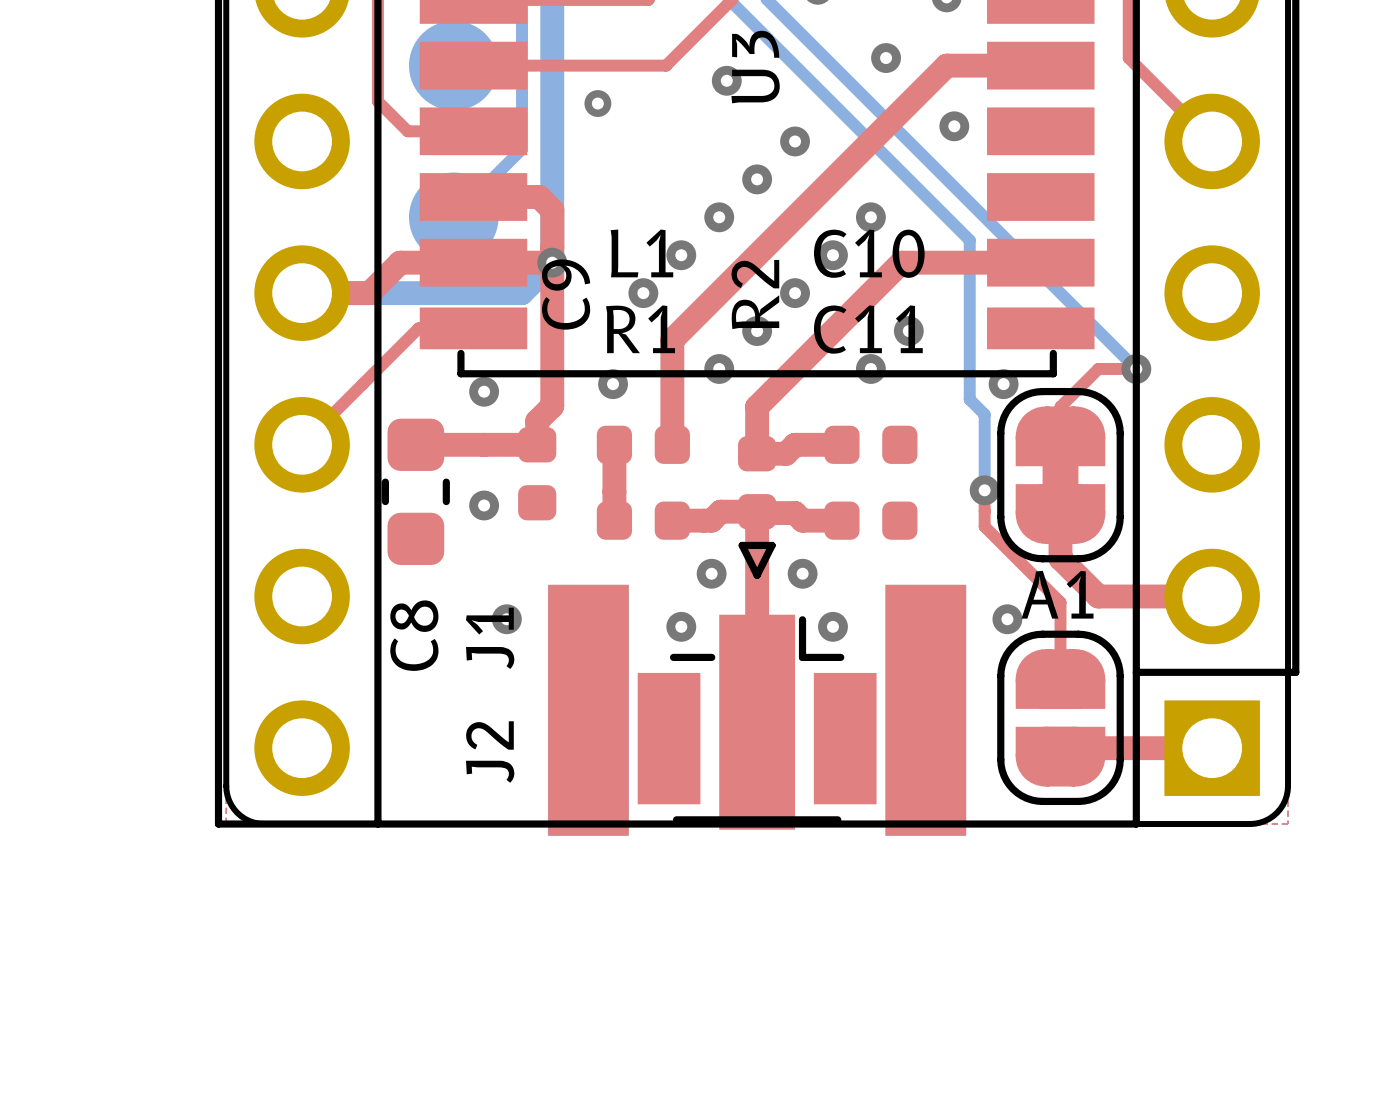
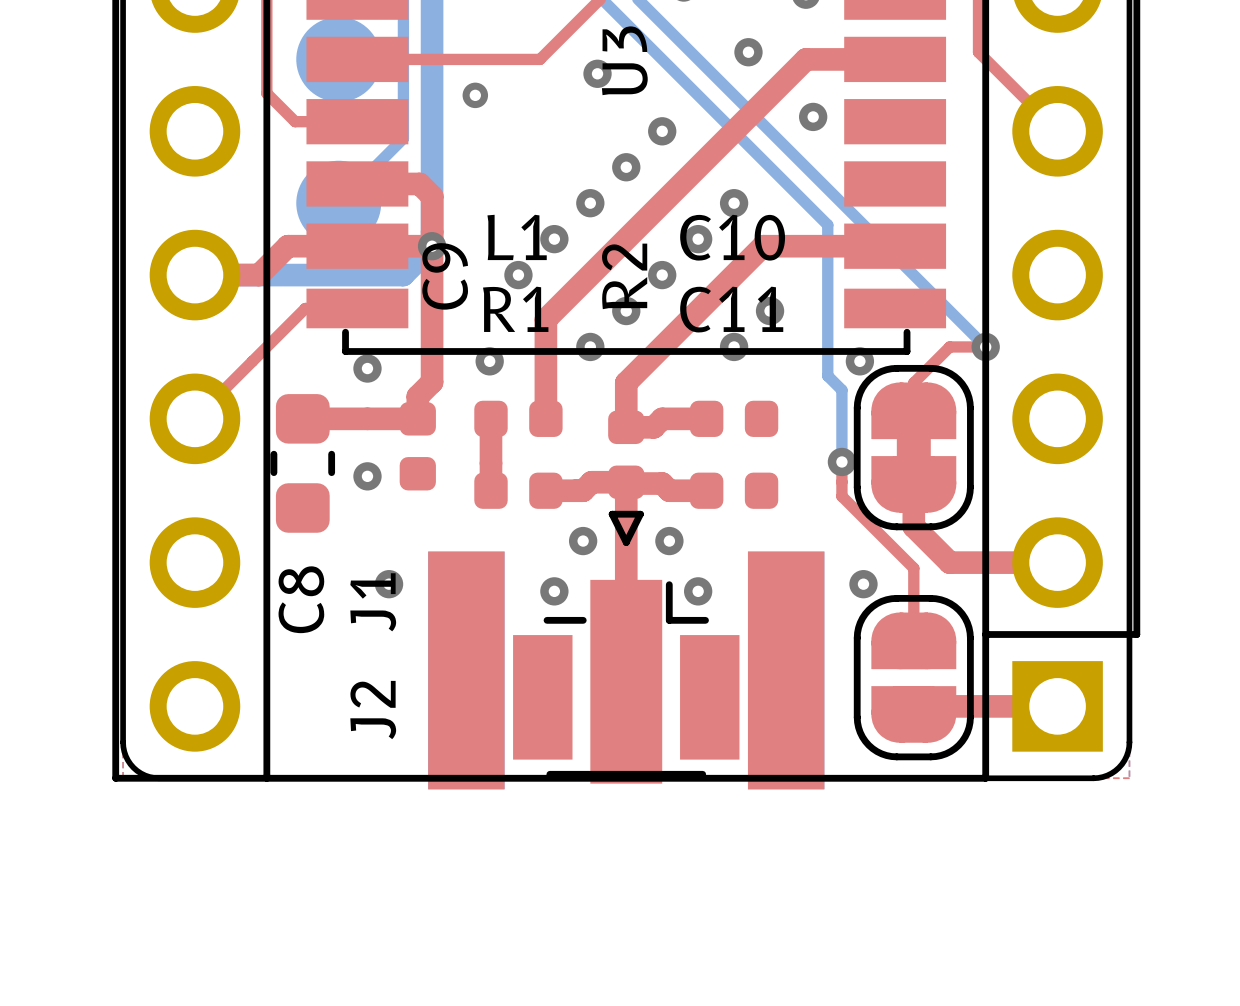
A1 name: A1 (1057, 594) -> none

